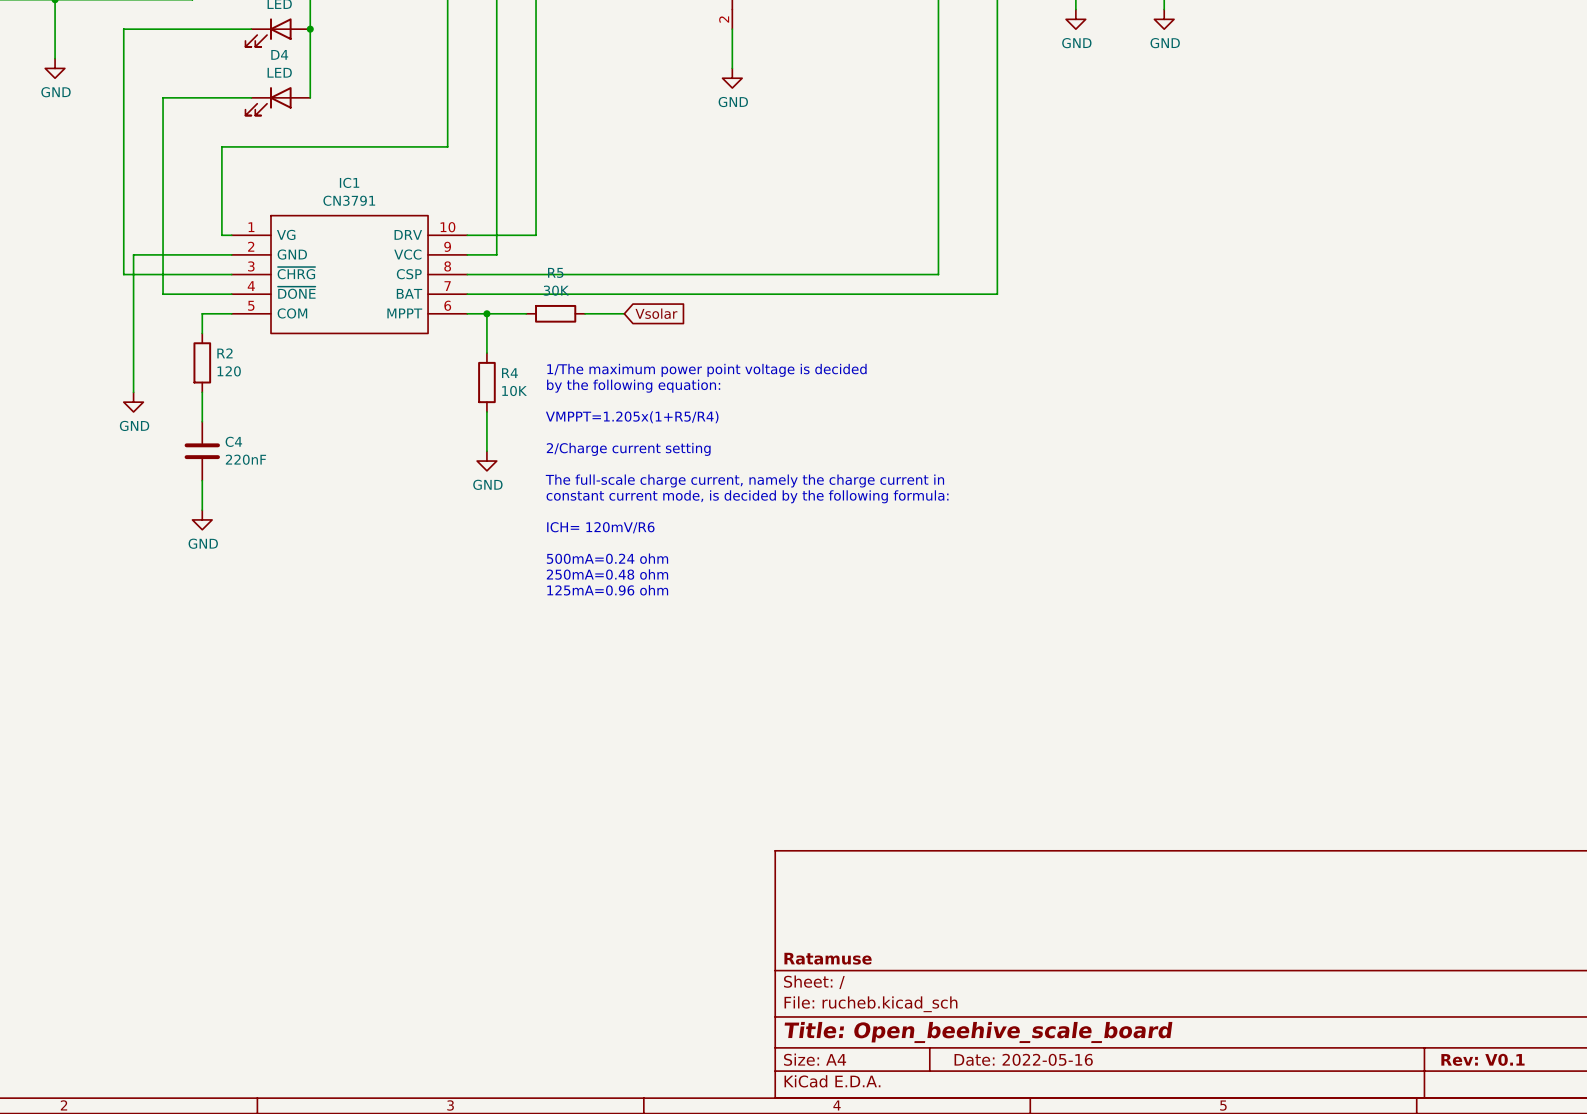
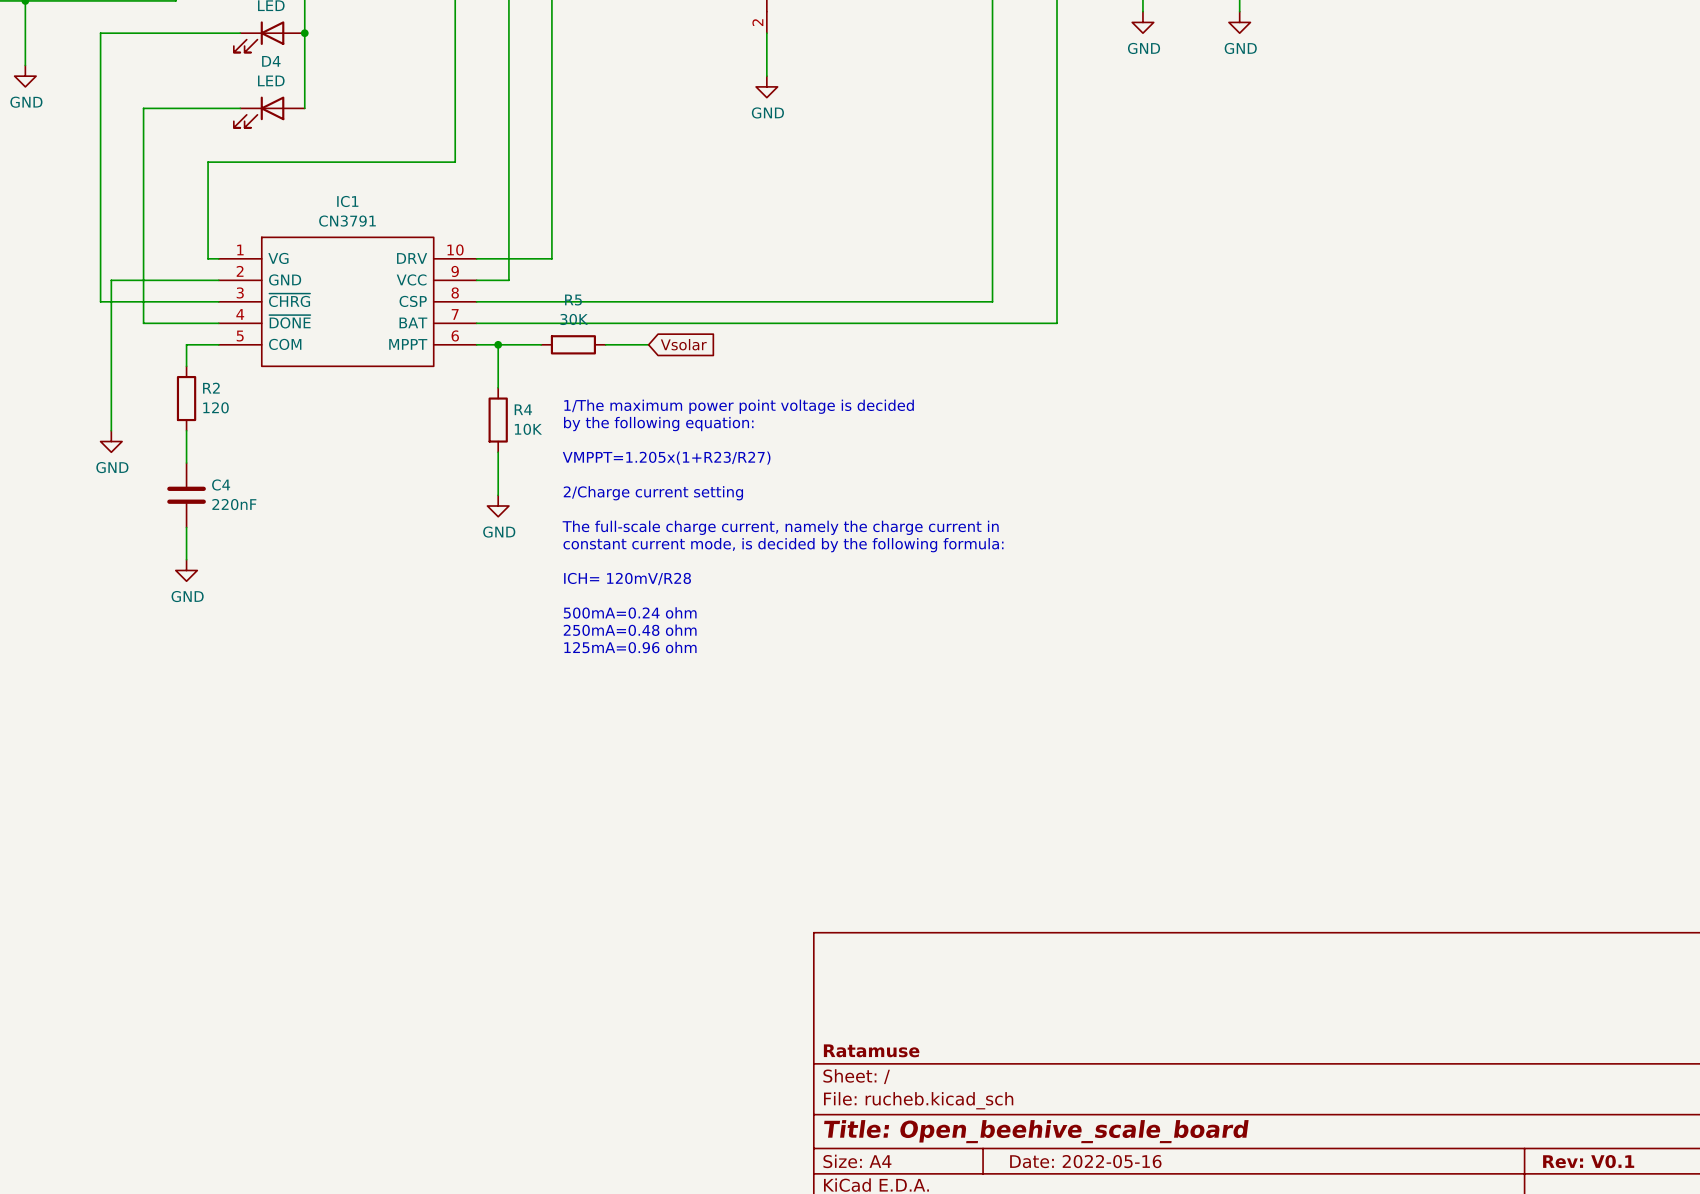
text: VMPPT=1.205x(1+R5/R4) (632, 417) -> VMPPT=1.205x(1+R23/R27) (666, 458)
text: ICH= 120mV/R6 (600, 527) -> ICH= 120mV/R28 (627, 579)

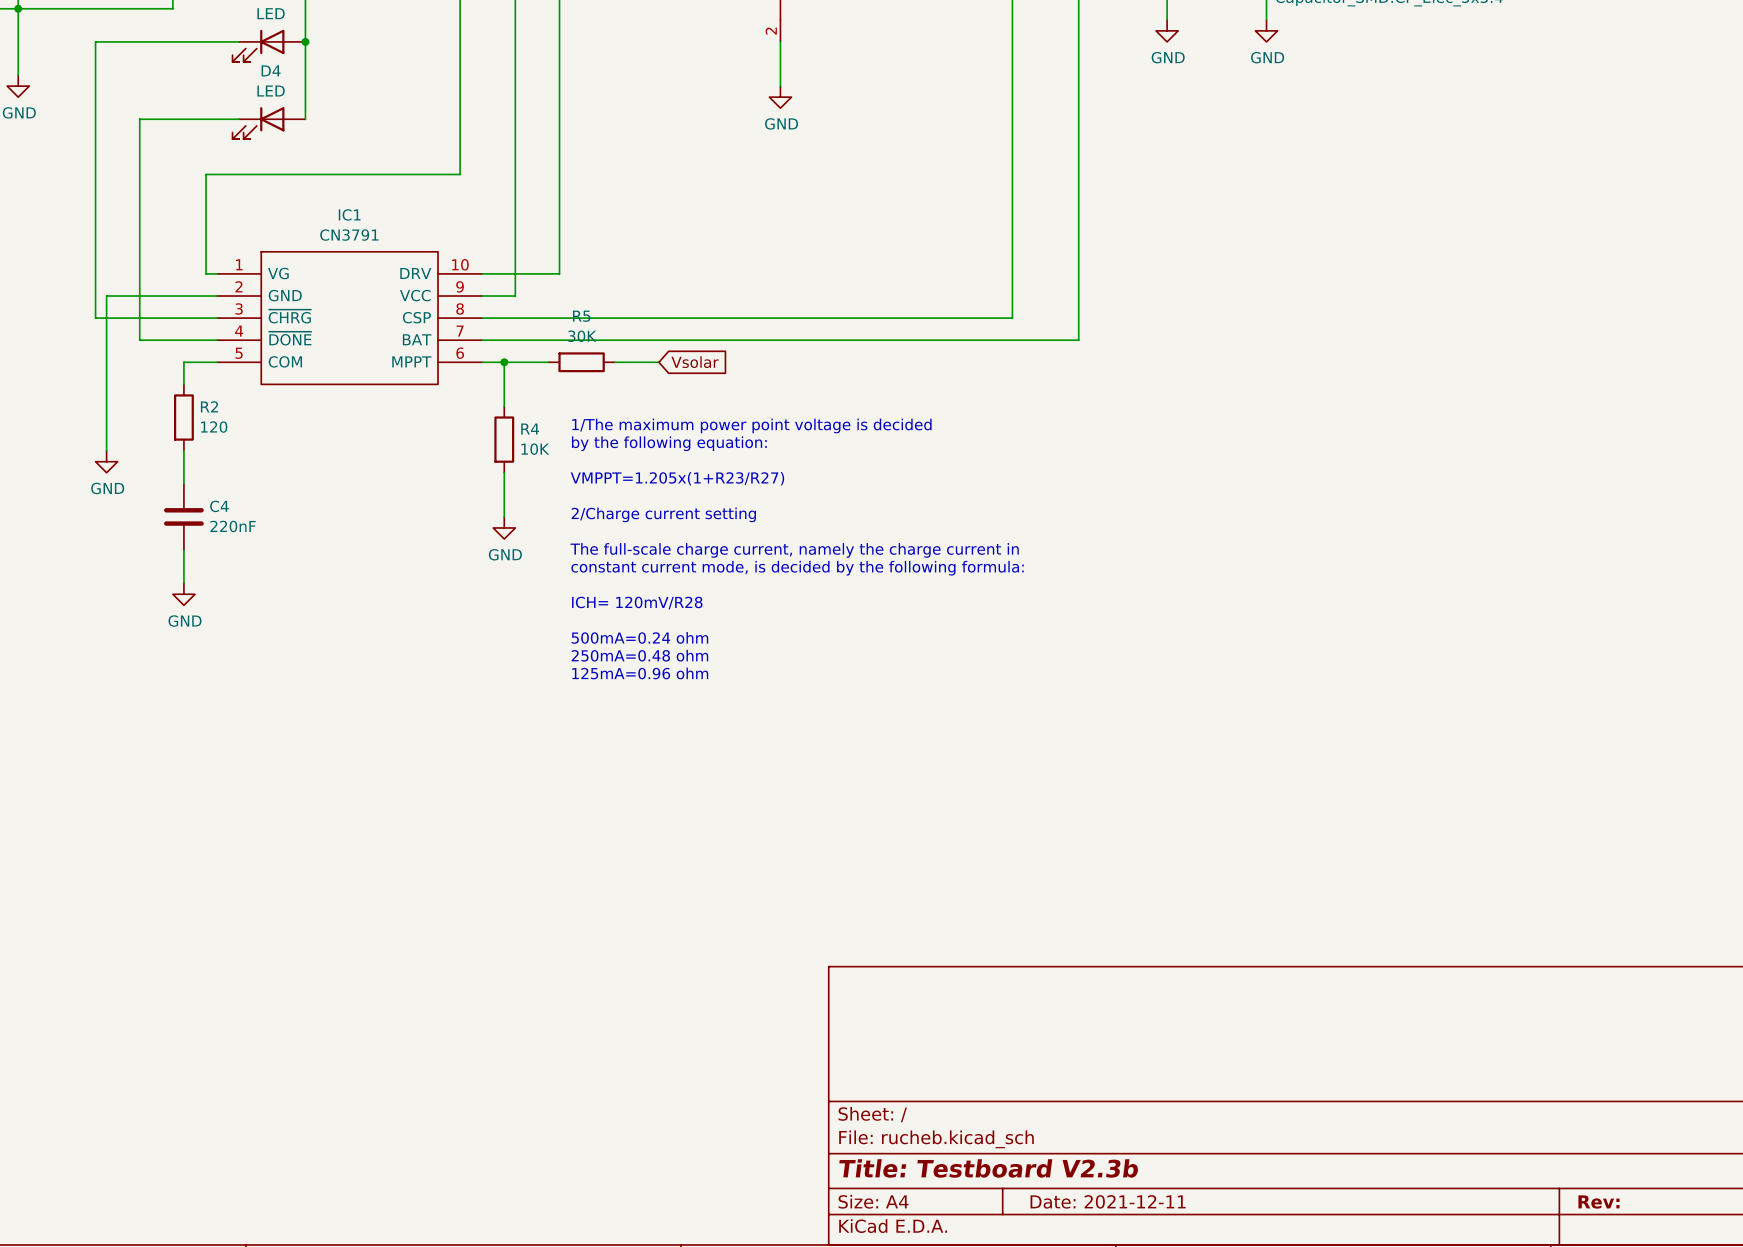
title block: Ratamuse (871, 1050) -> none
title block: Title: Open_beehive_scale_board (1036, 1131) -> Title: Testboard V2.3b (988, 1168)
title block: Date: 2022-05-16 (1085, 1161) -> Date: 2021-12-11 (1108, 1201)
title block: Rev: V0.1 (1588, 1161) -> Rev: (1598, 1202)

